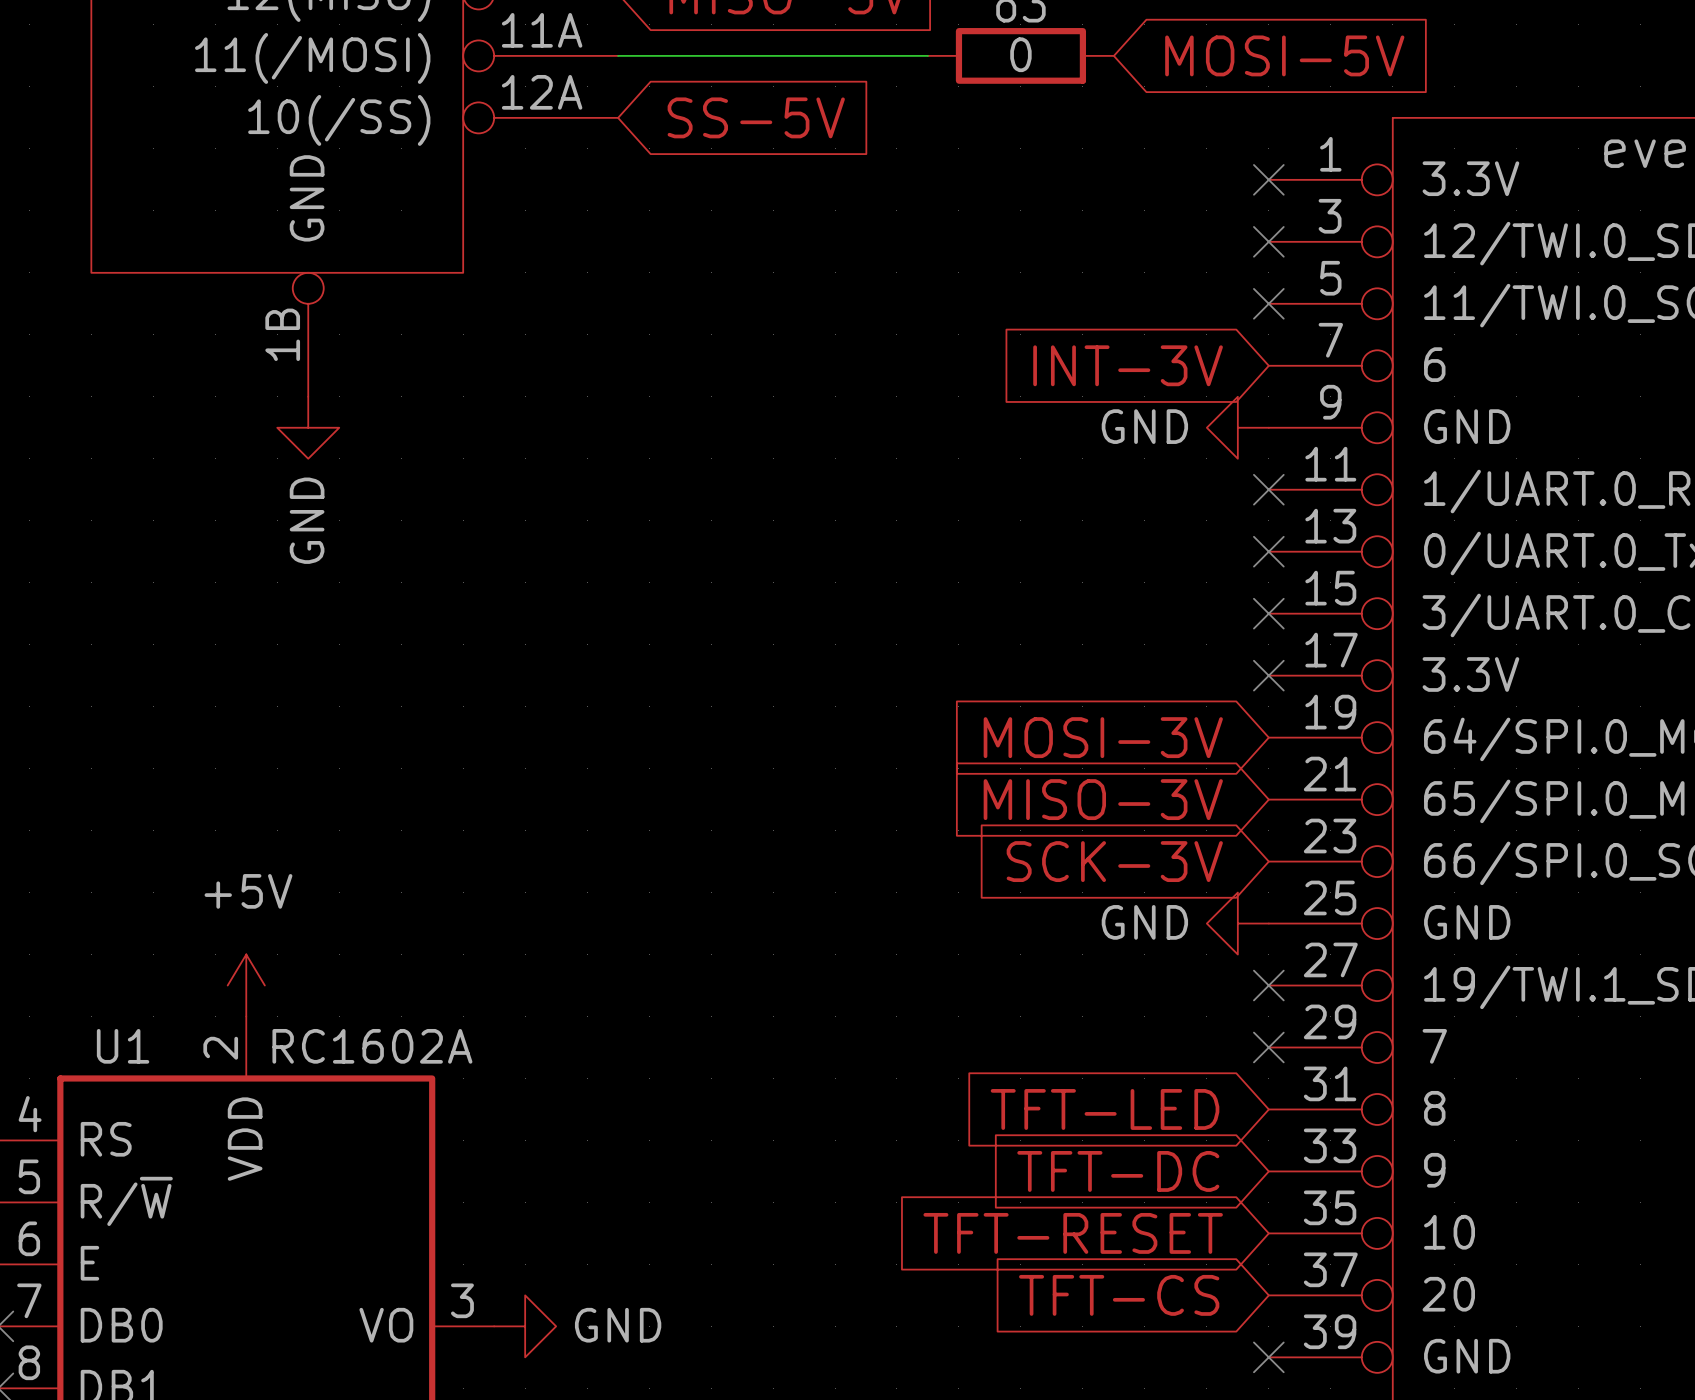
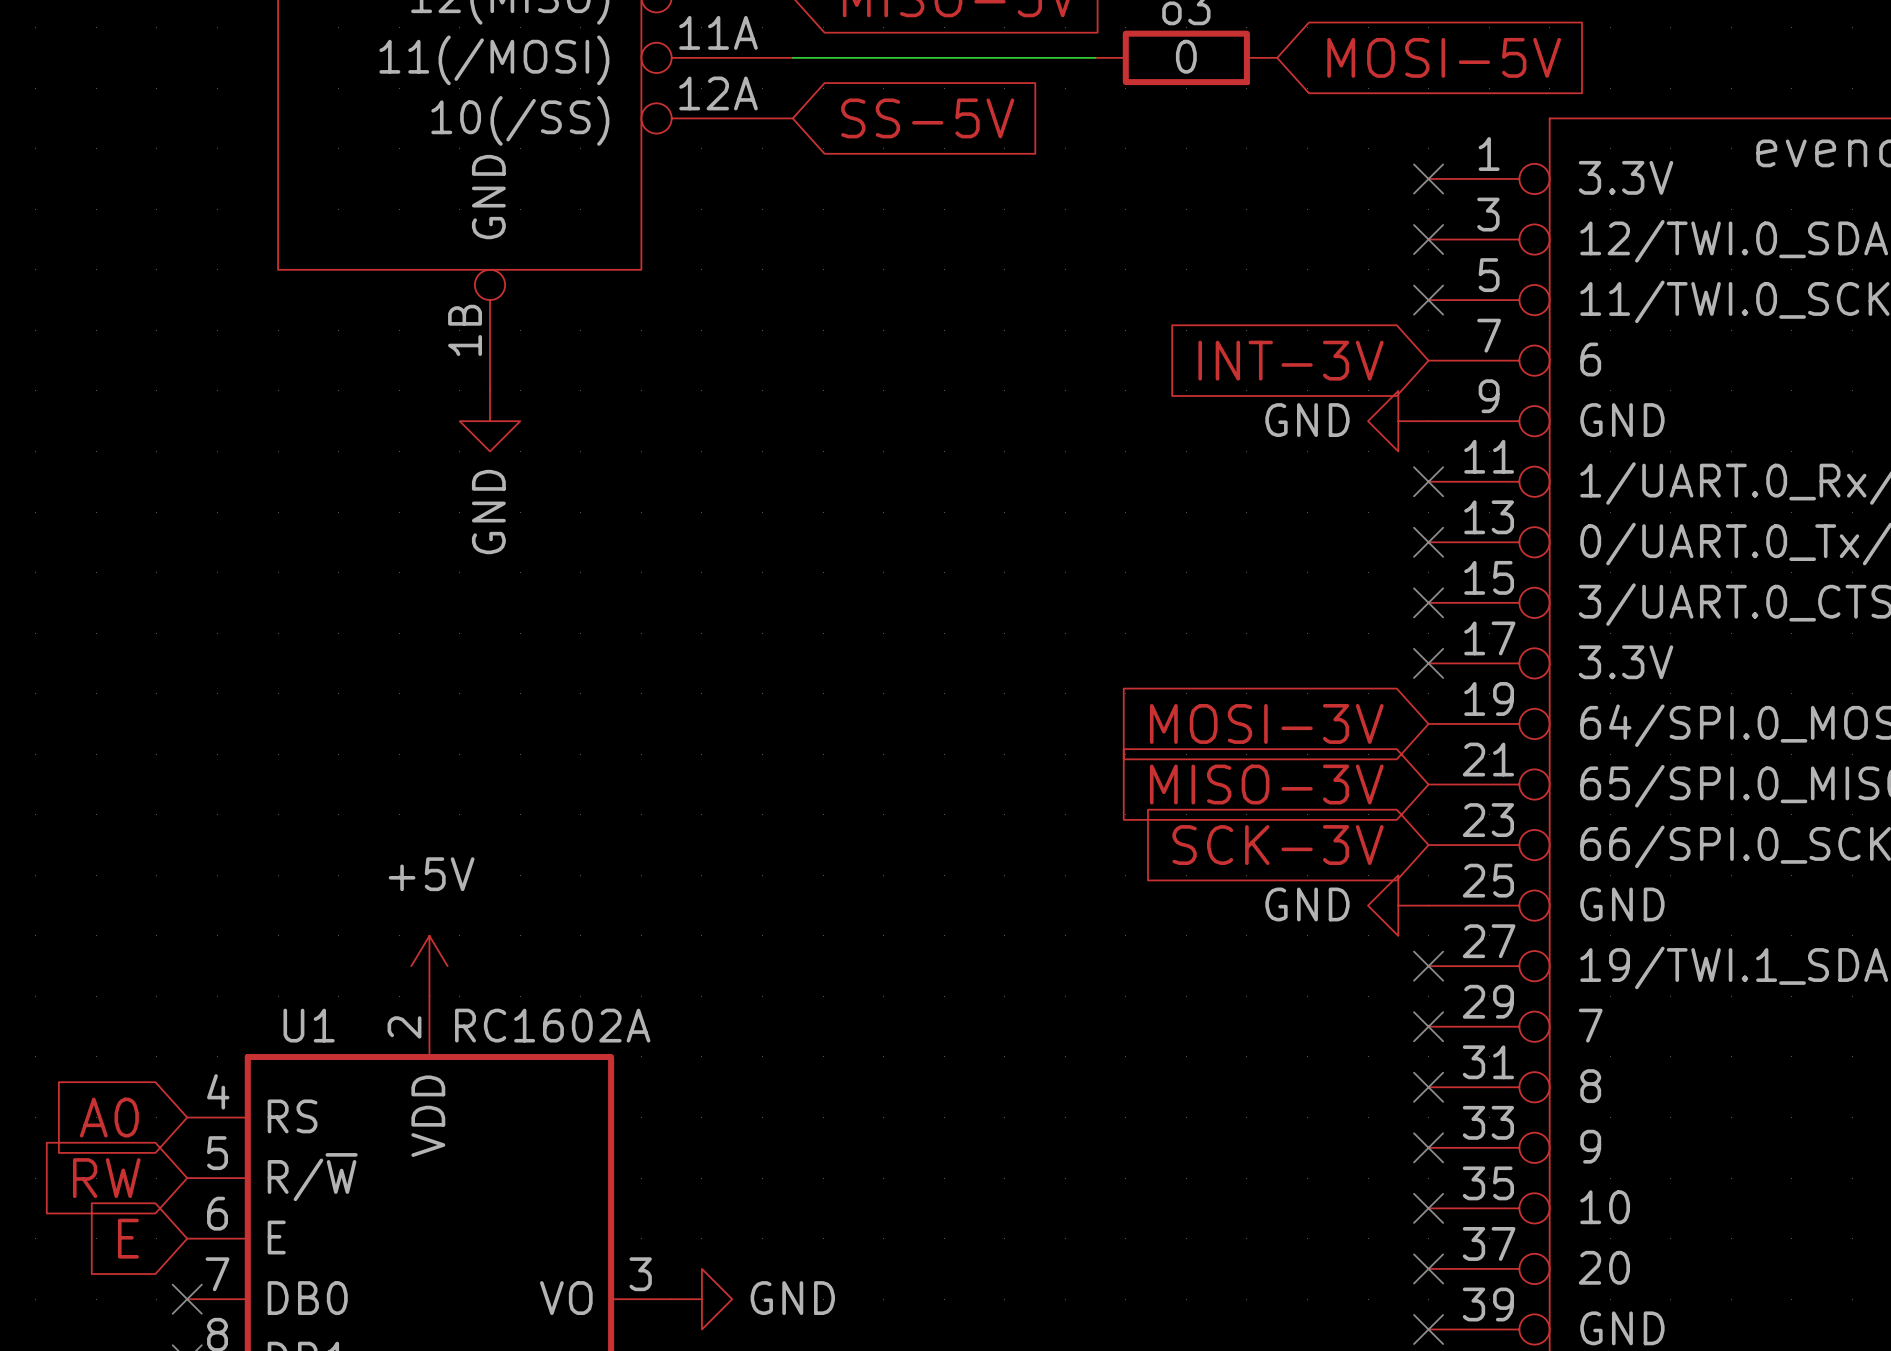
global label: TFT-LED (1105, 1109) -> none
no-connect mark: none -> (1428, 1087)
global label: TFT-DС (1118, 1171) -> none
no-connect mark: none -> (1428, 1147)
global label: TFT-RESET (1073, 1233) -> none
no-connect mark: none -> (1428, 1208)
global label: TFT-CS (1119, 1295) -> none
no-connect mark: none -> (1428, 1268)

